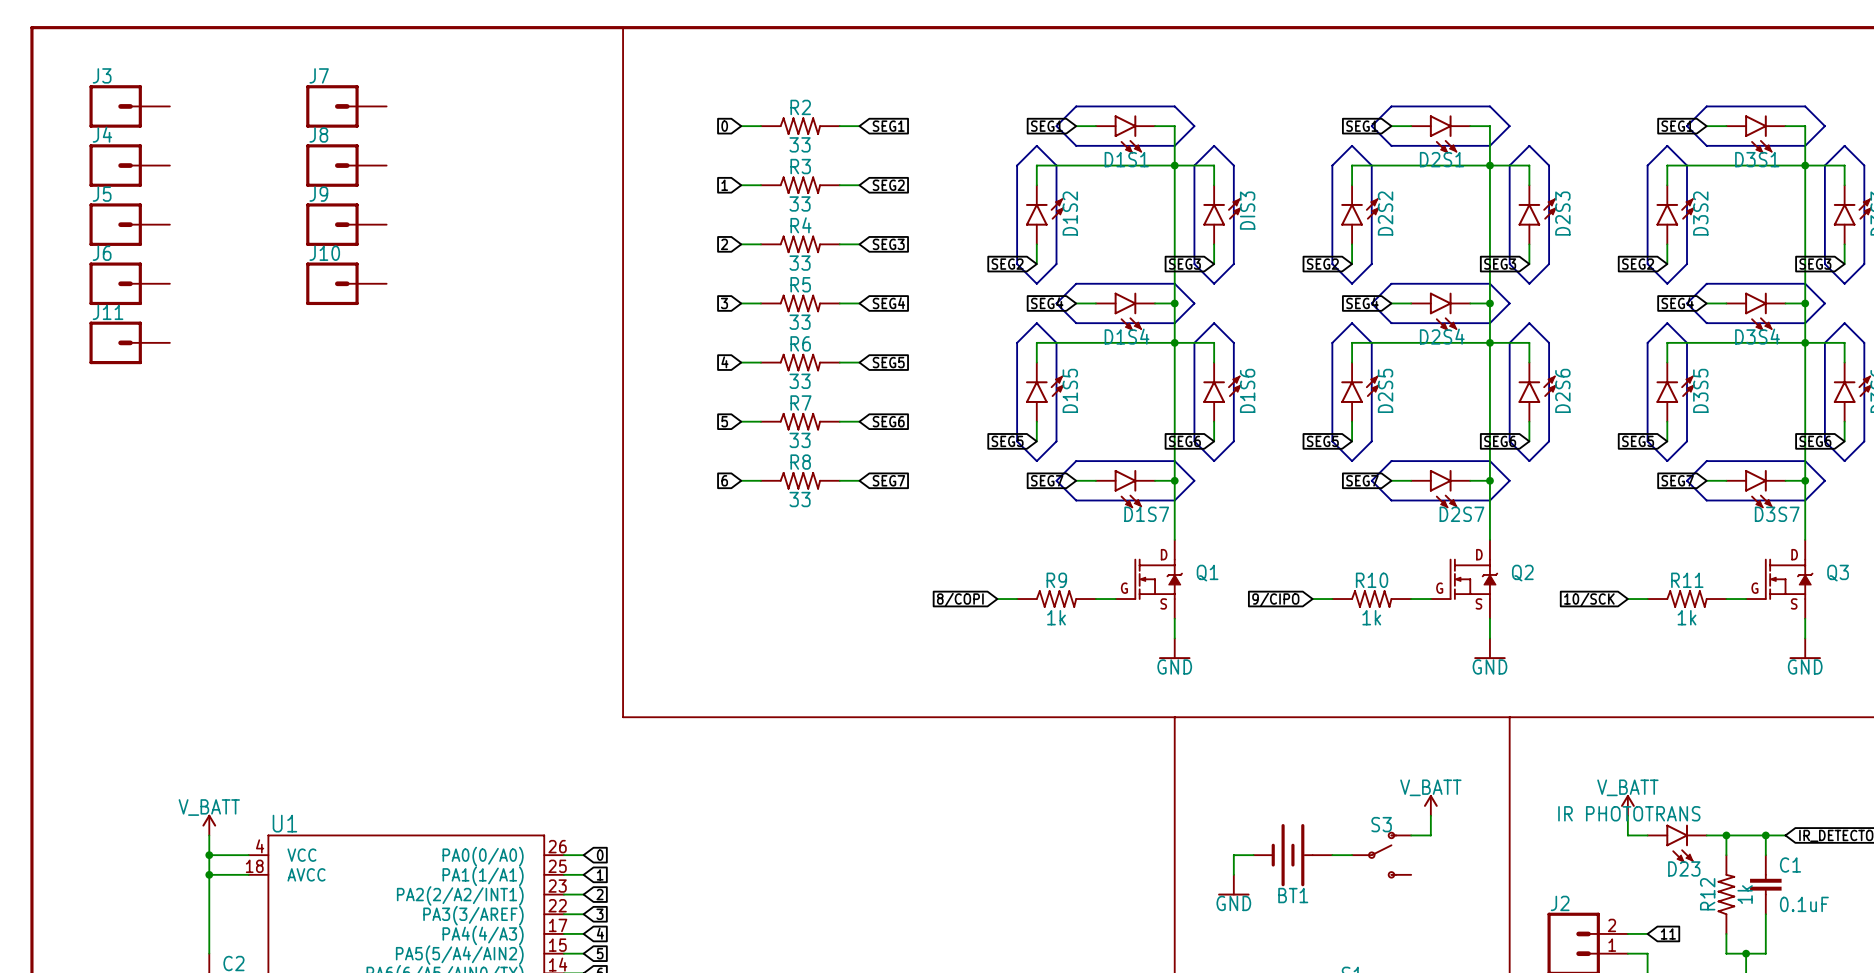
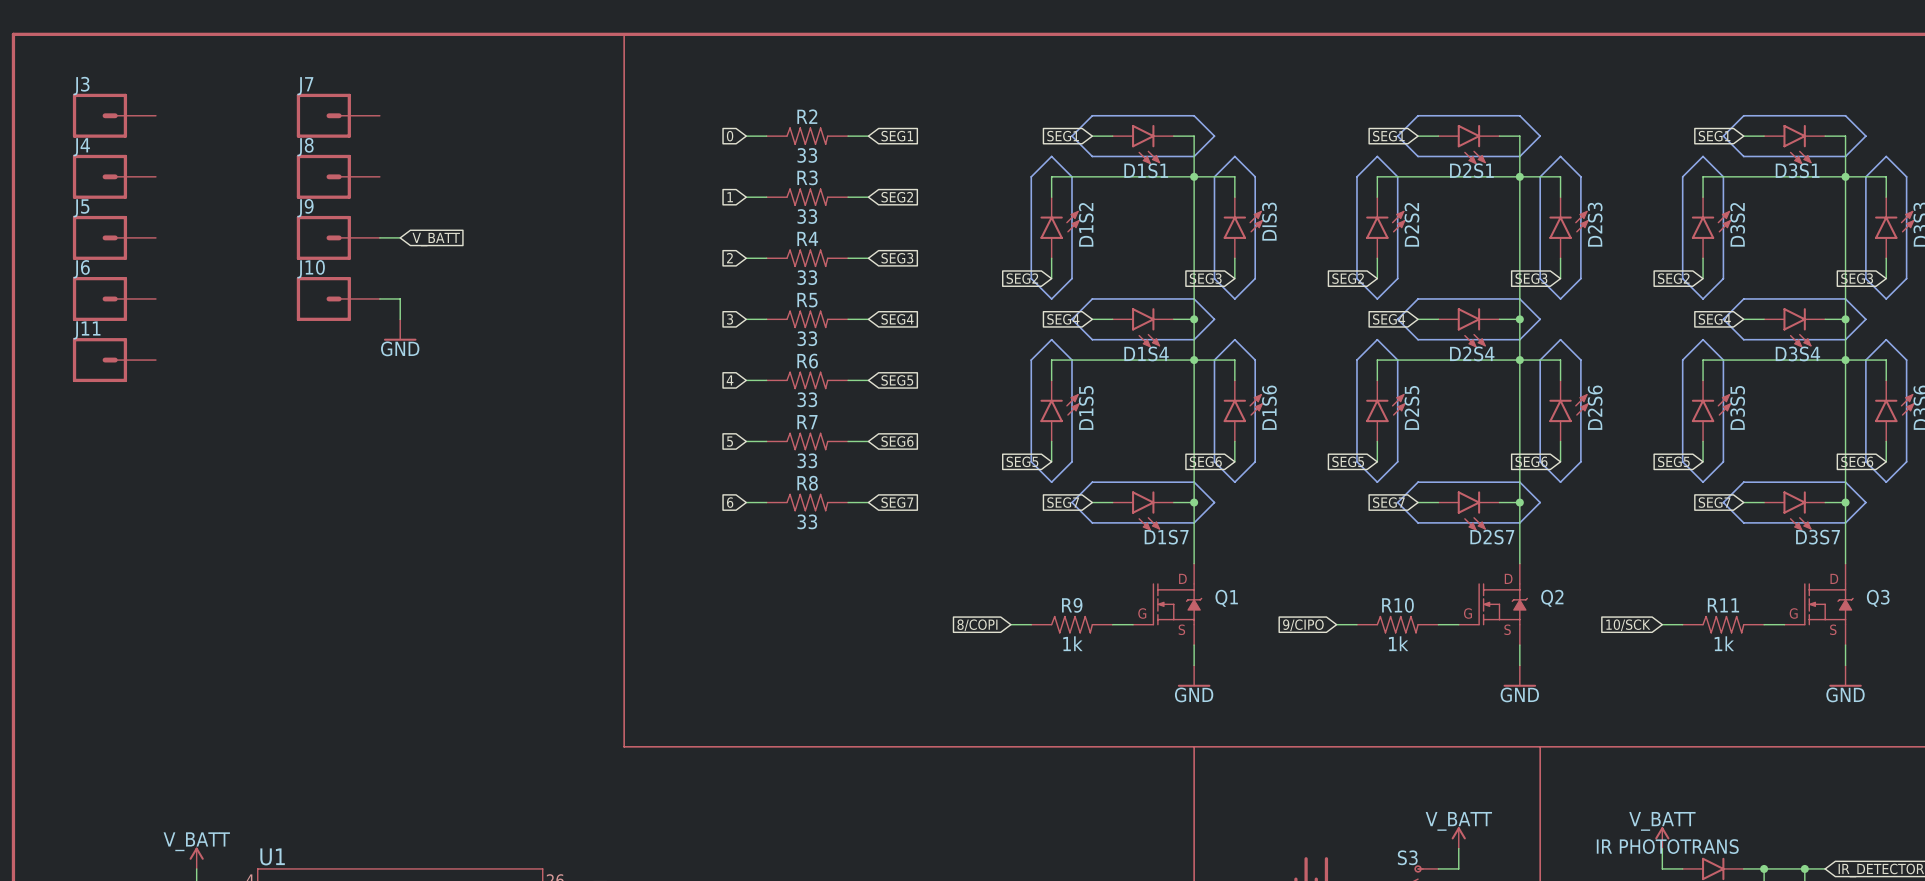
wire: none -> (379, 237) (400, 237)
global label: none -> V_BATT (436, 239)
wire: none -> (379, 298) (400, 298) (400, 319)
power symbol: none -> GND (400, 330)

